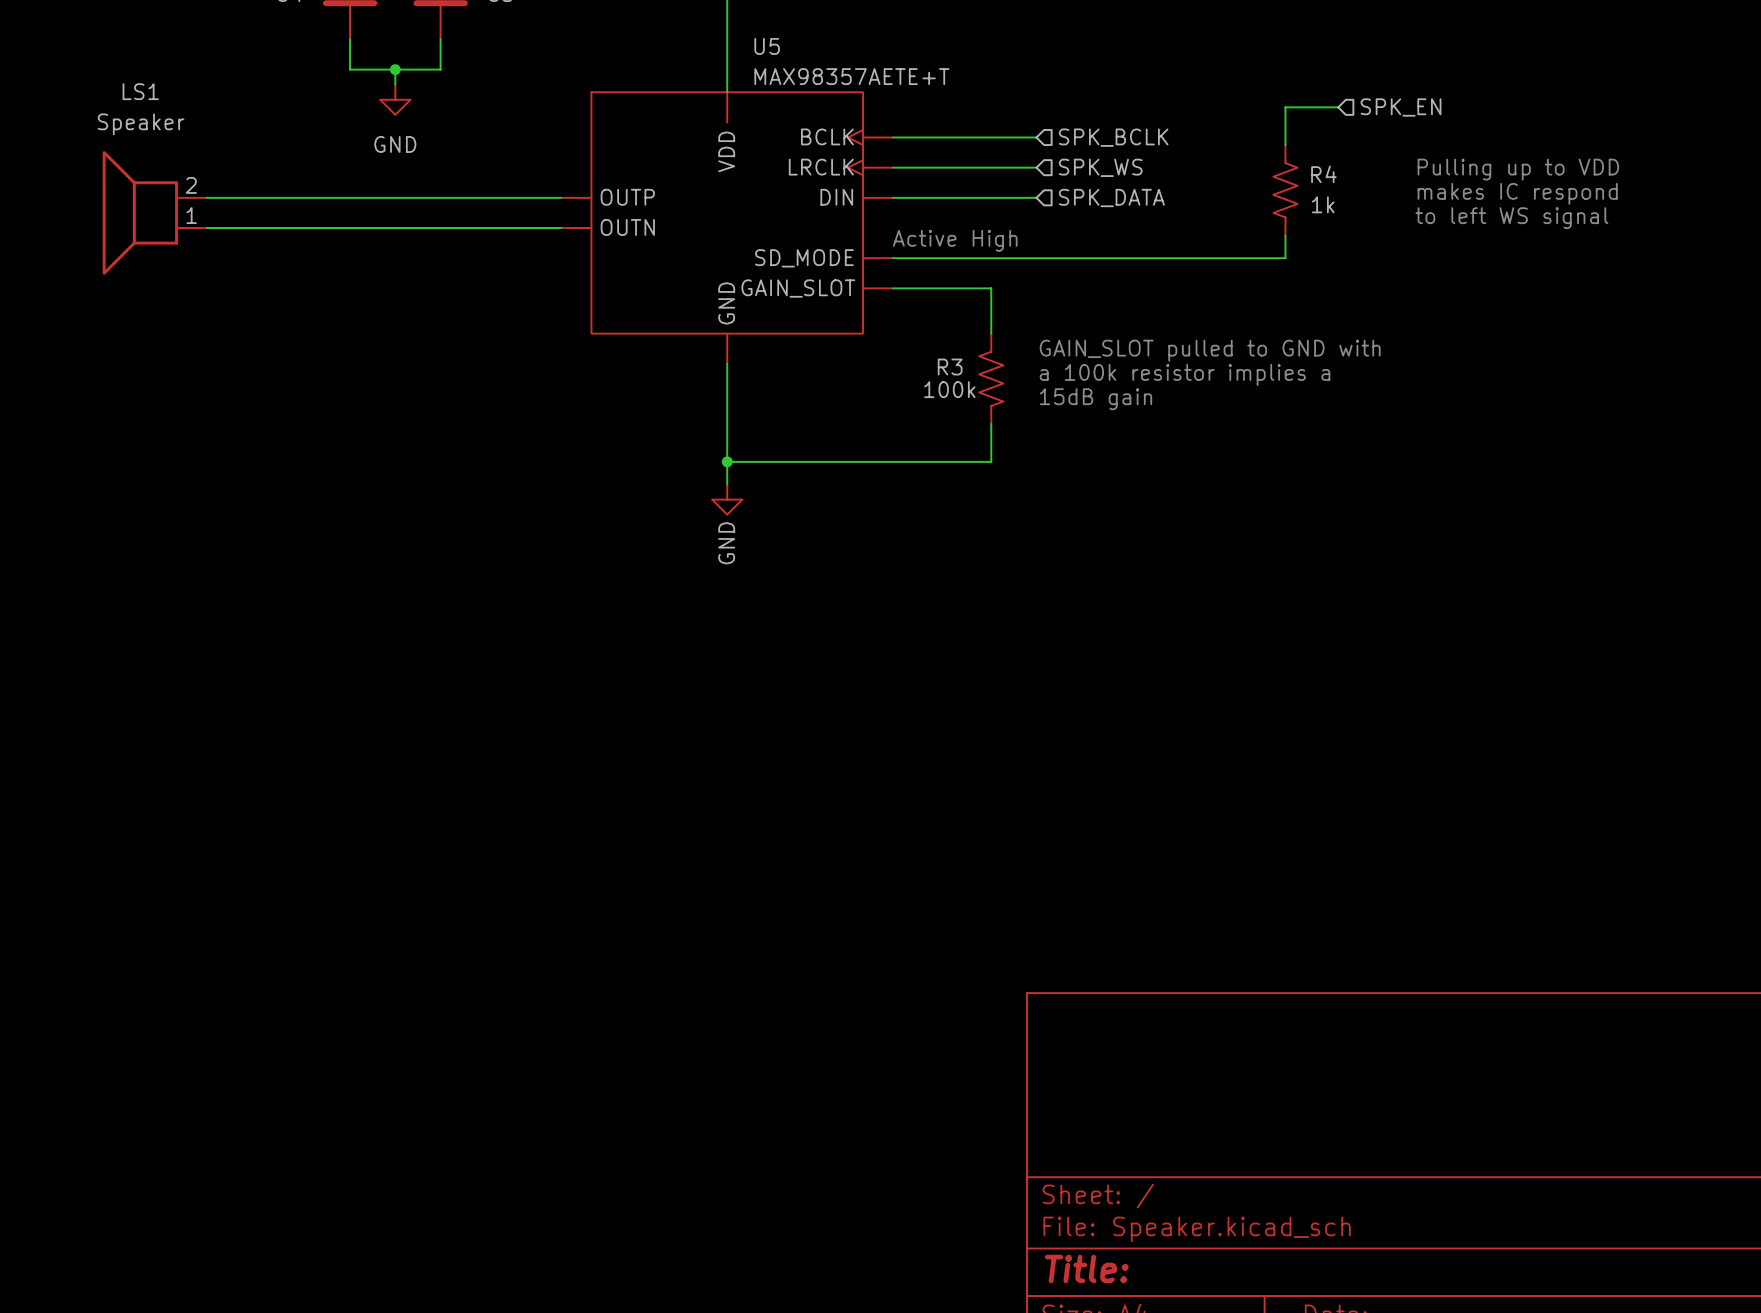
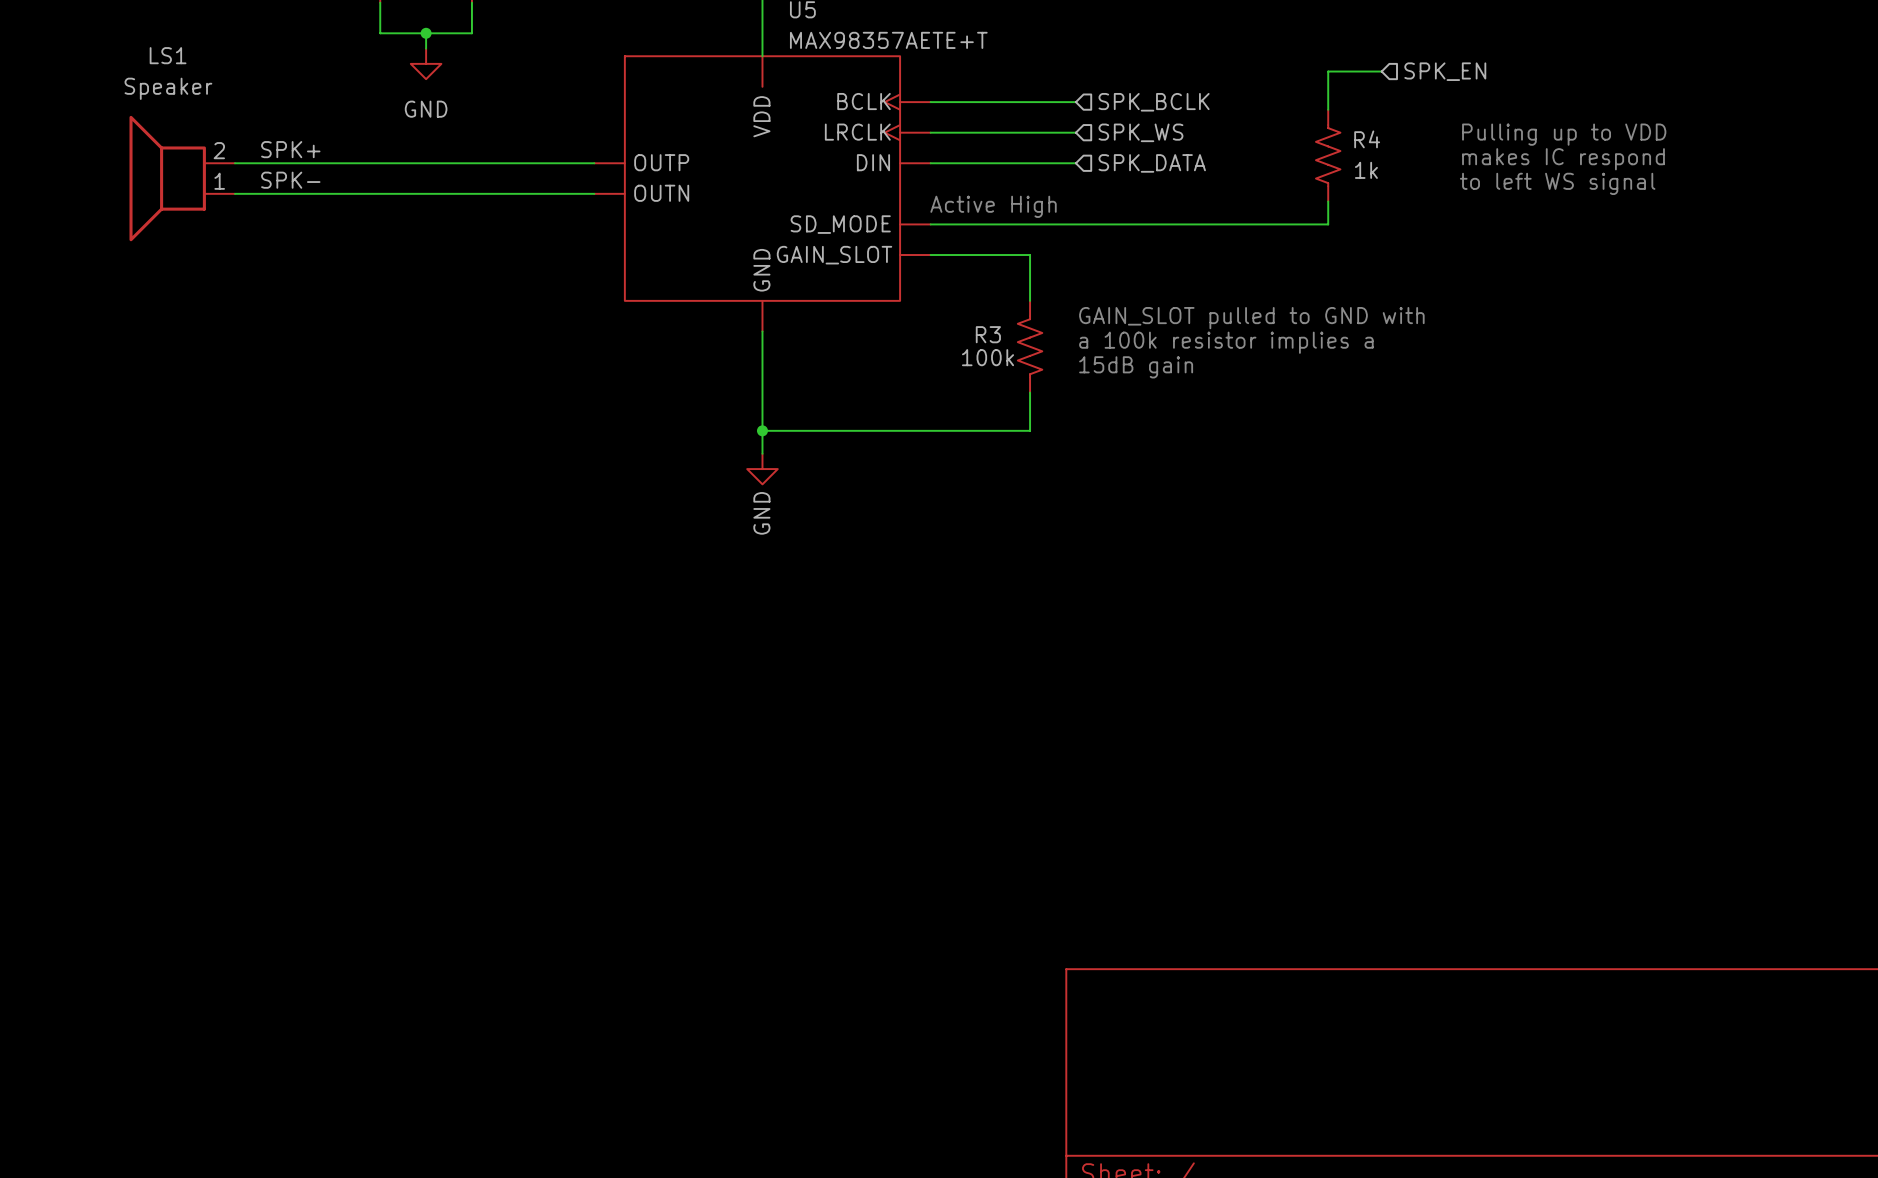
label: none -> SPK+ (290, 149)
label: none -> SPK- (290, 180)

